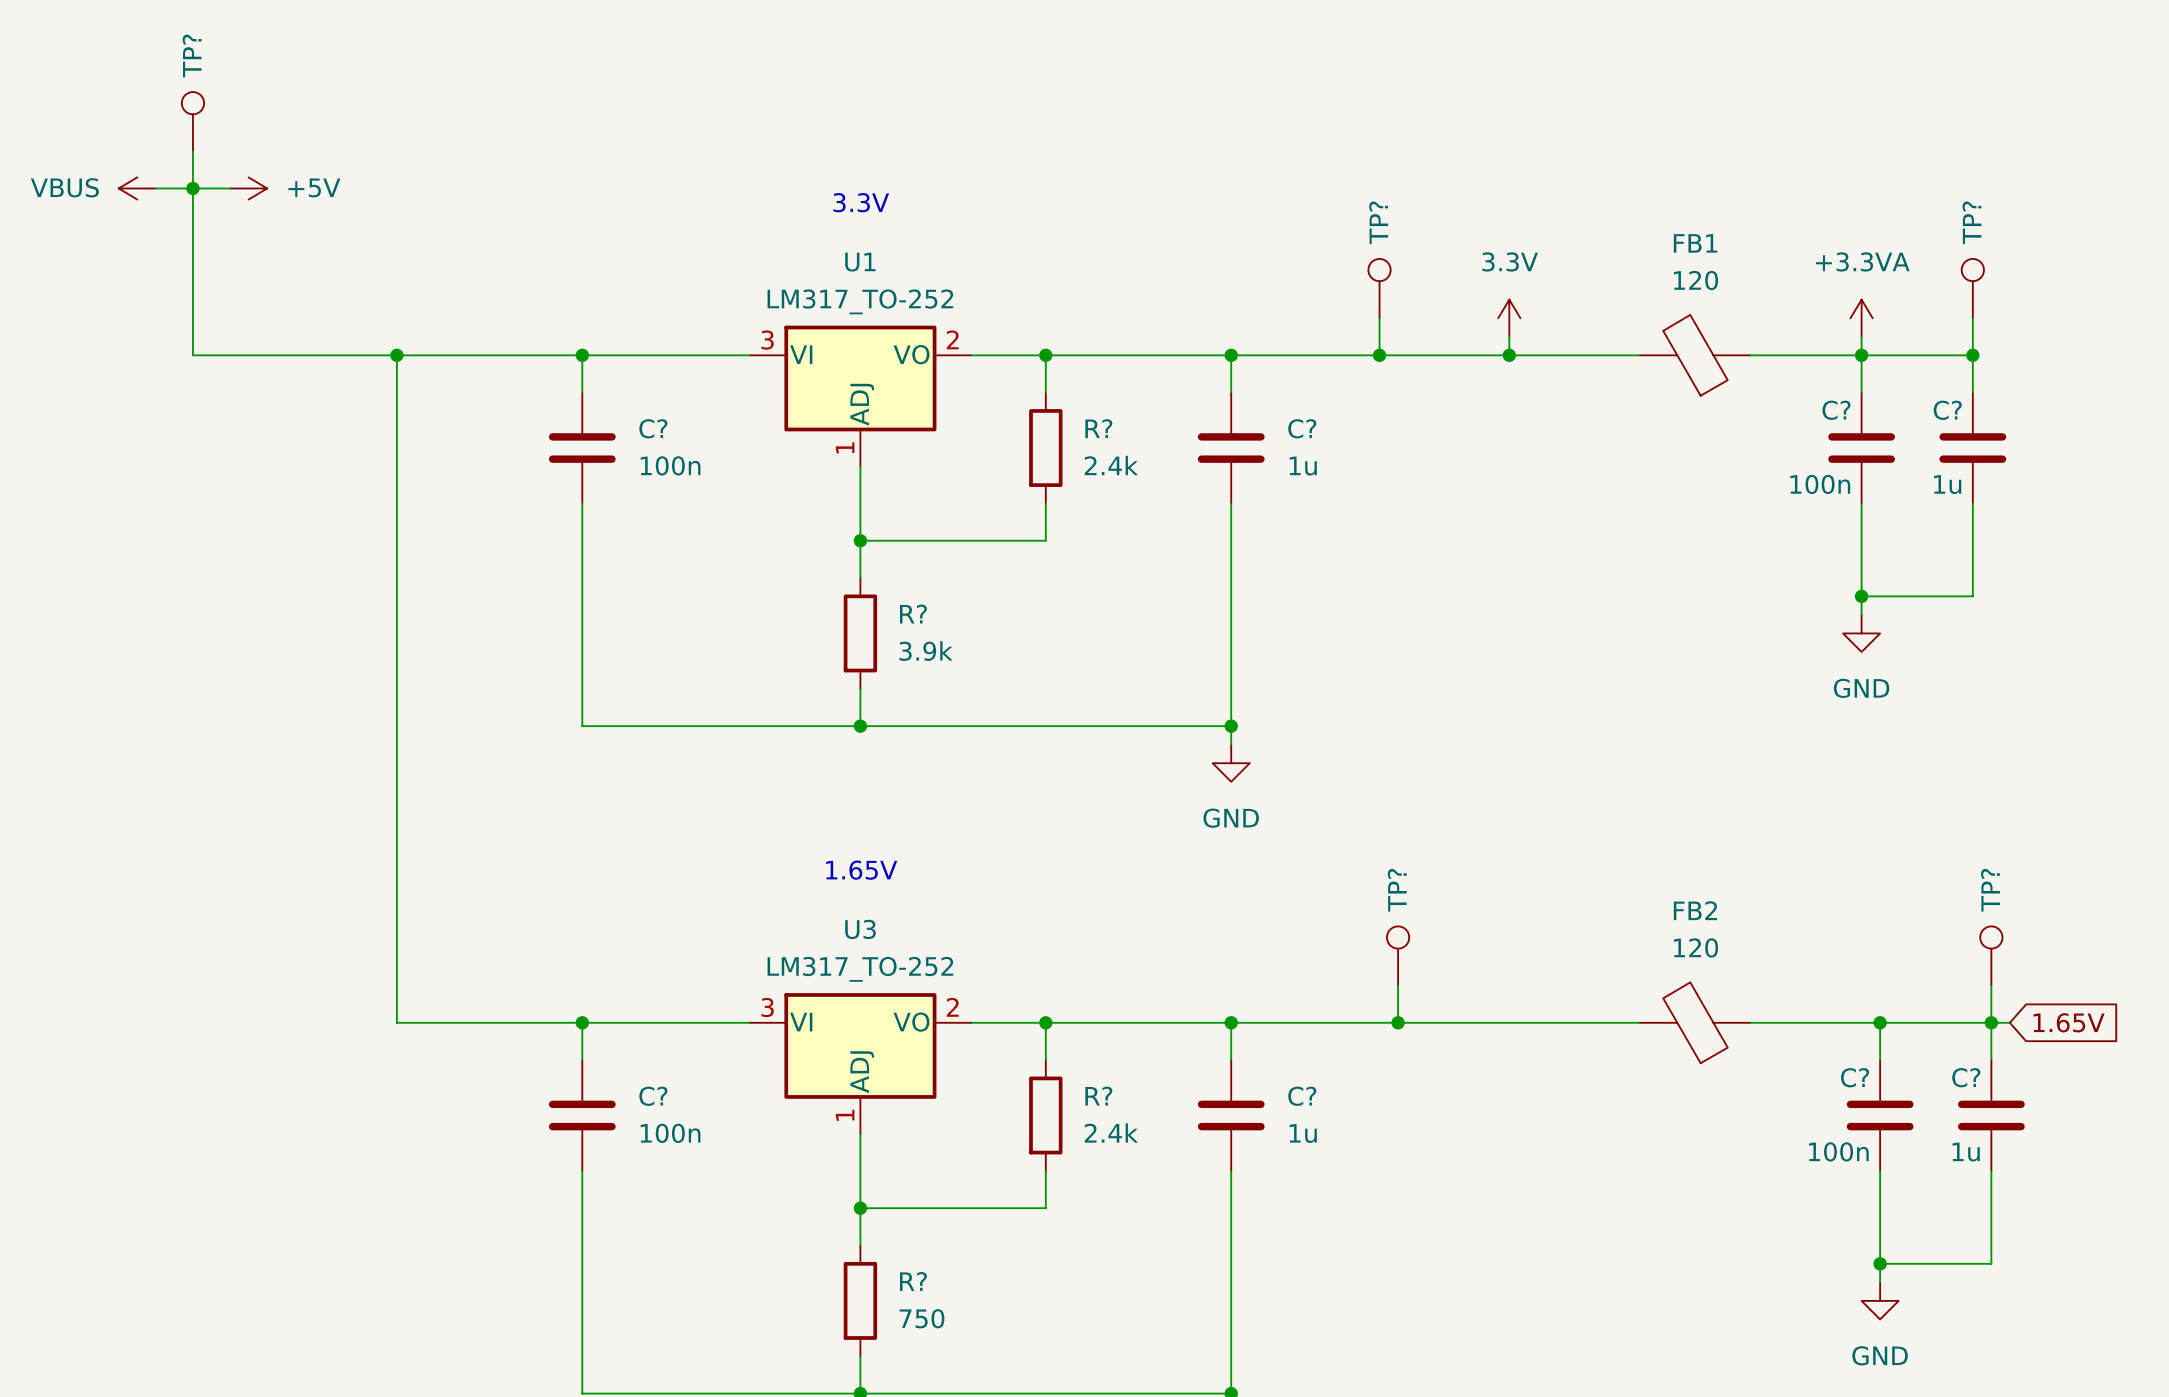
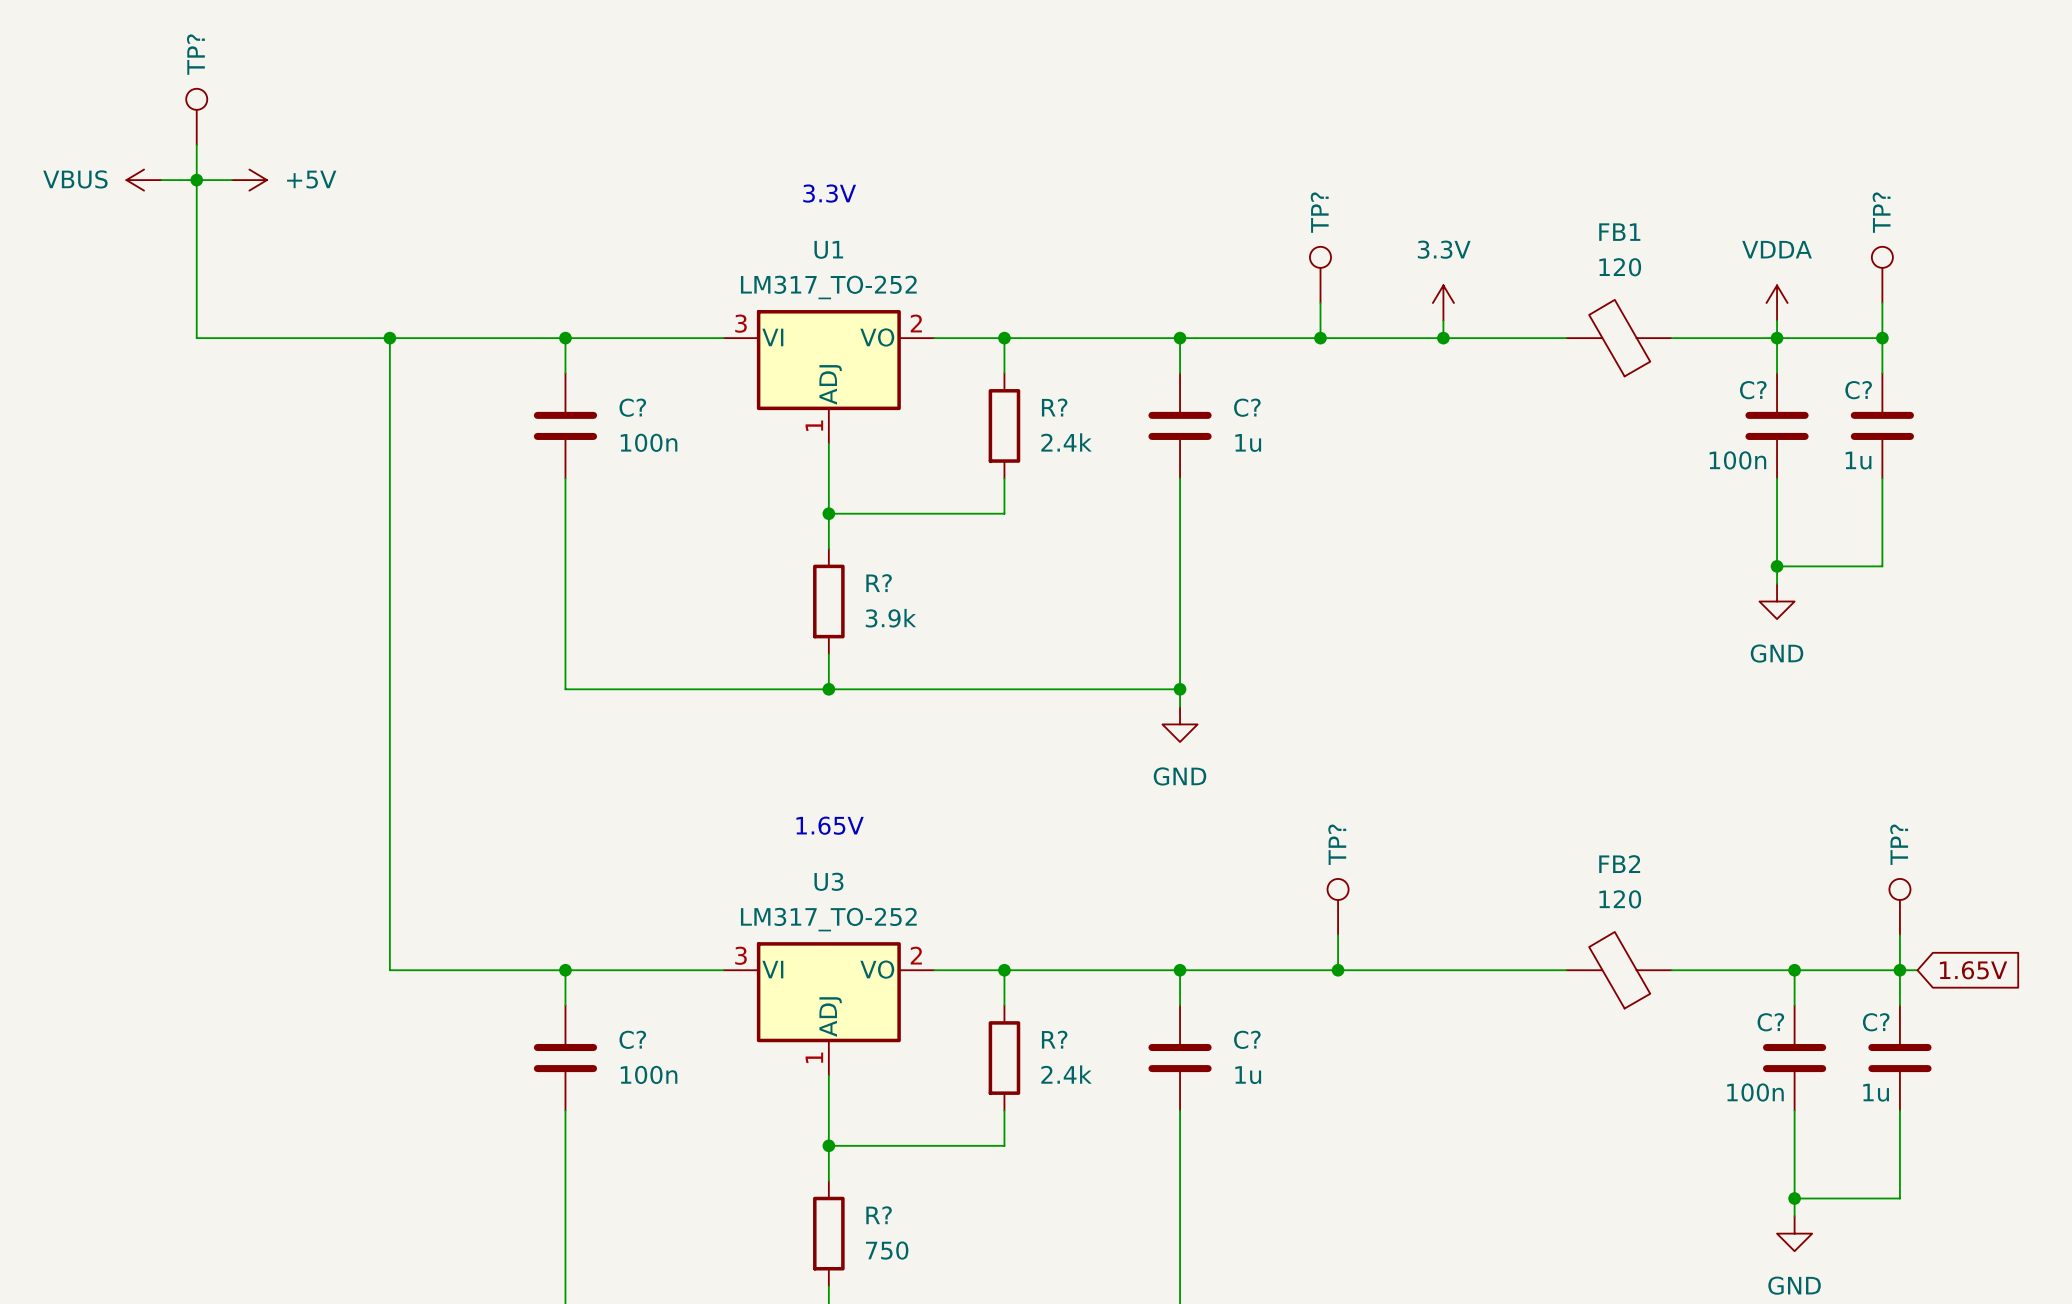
power symbol: +3.3VA (1861, 318) -> VDDA (1777, 303)

